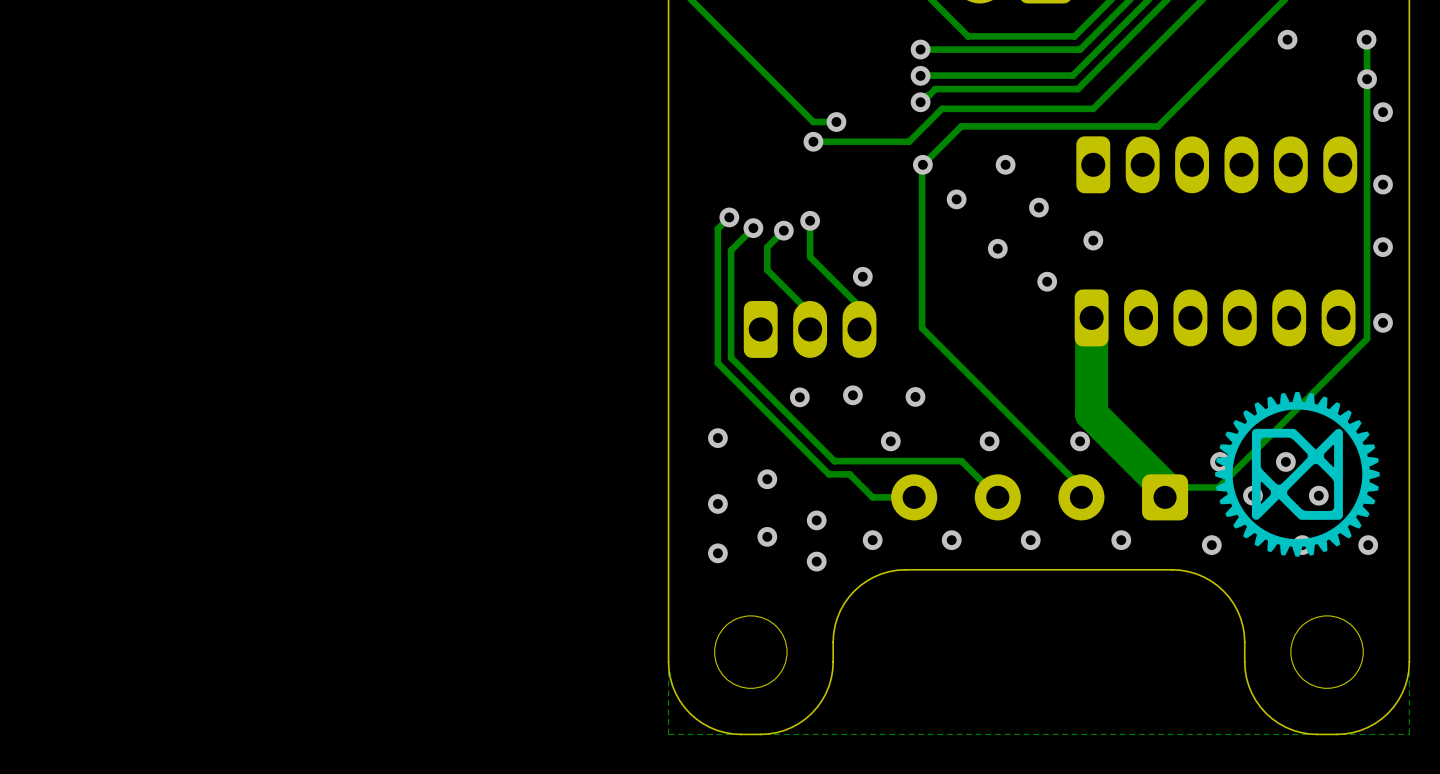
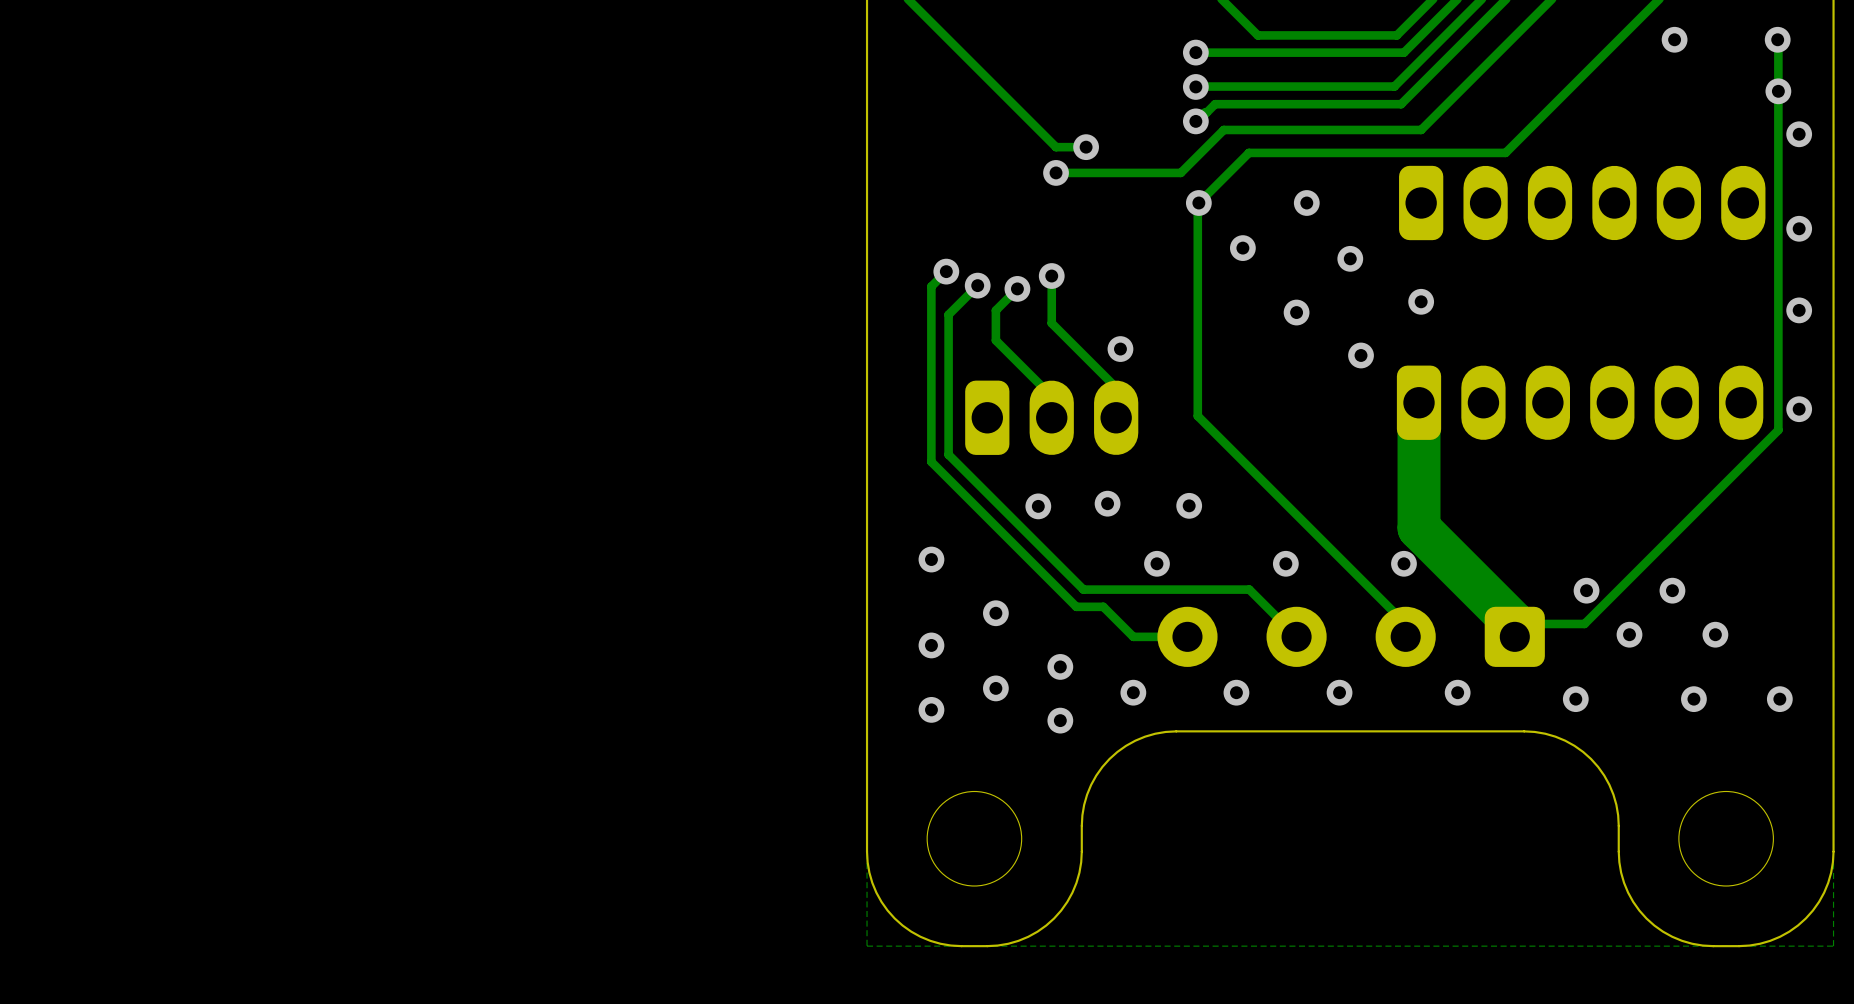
drawing: [1215, 392, 1380, 557] -> none

